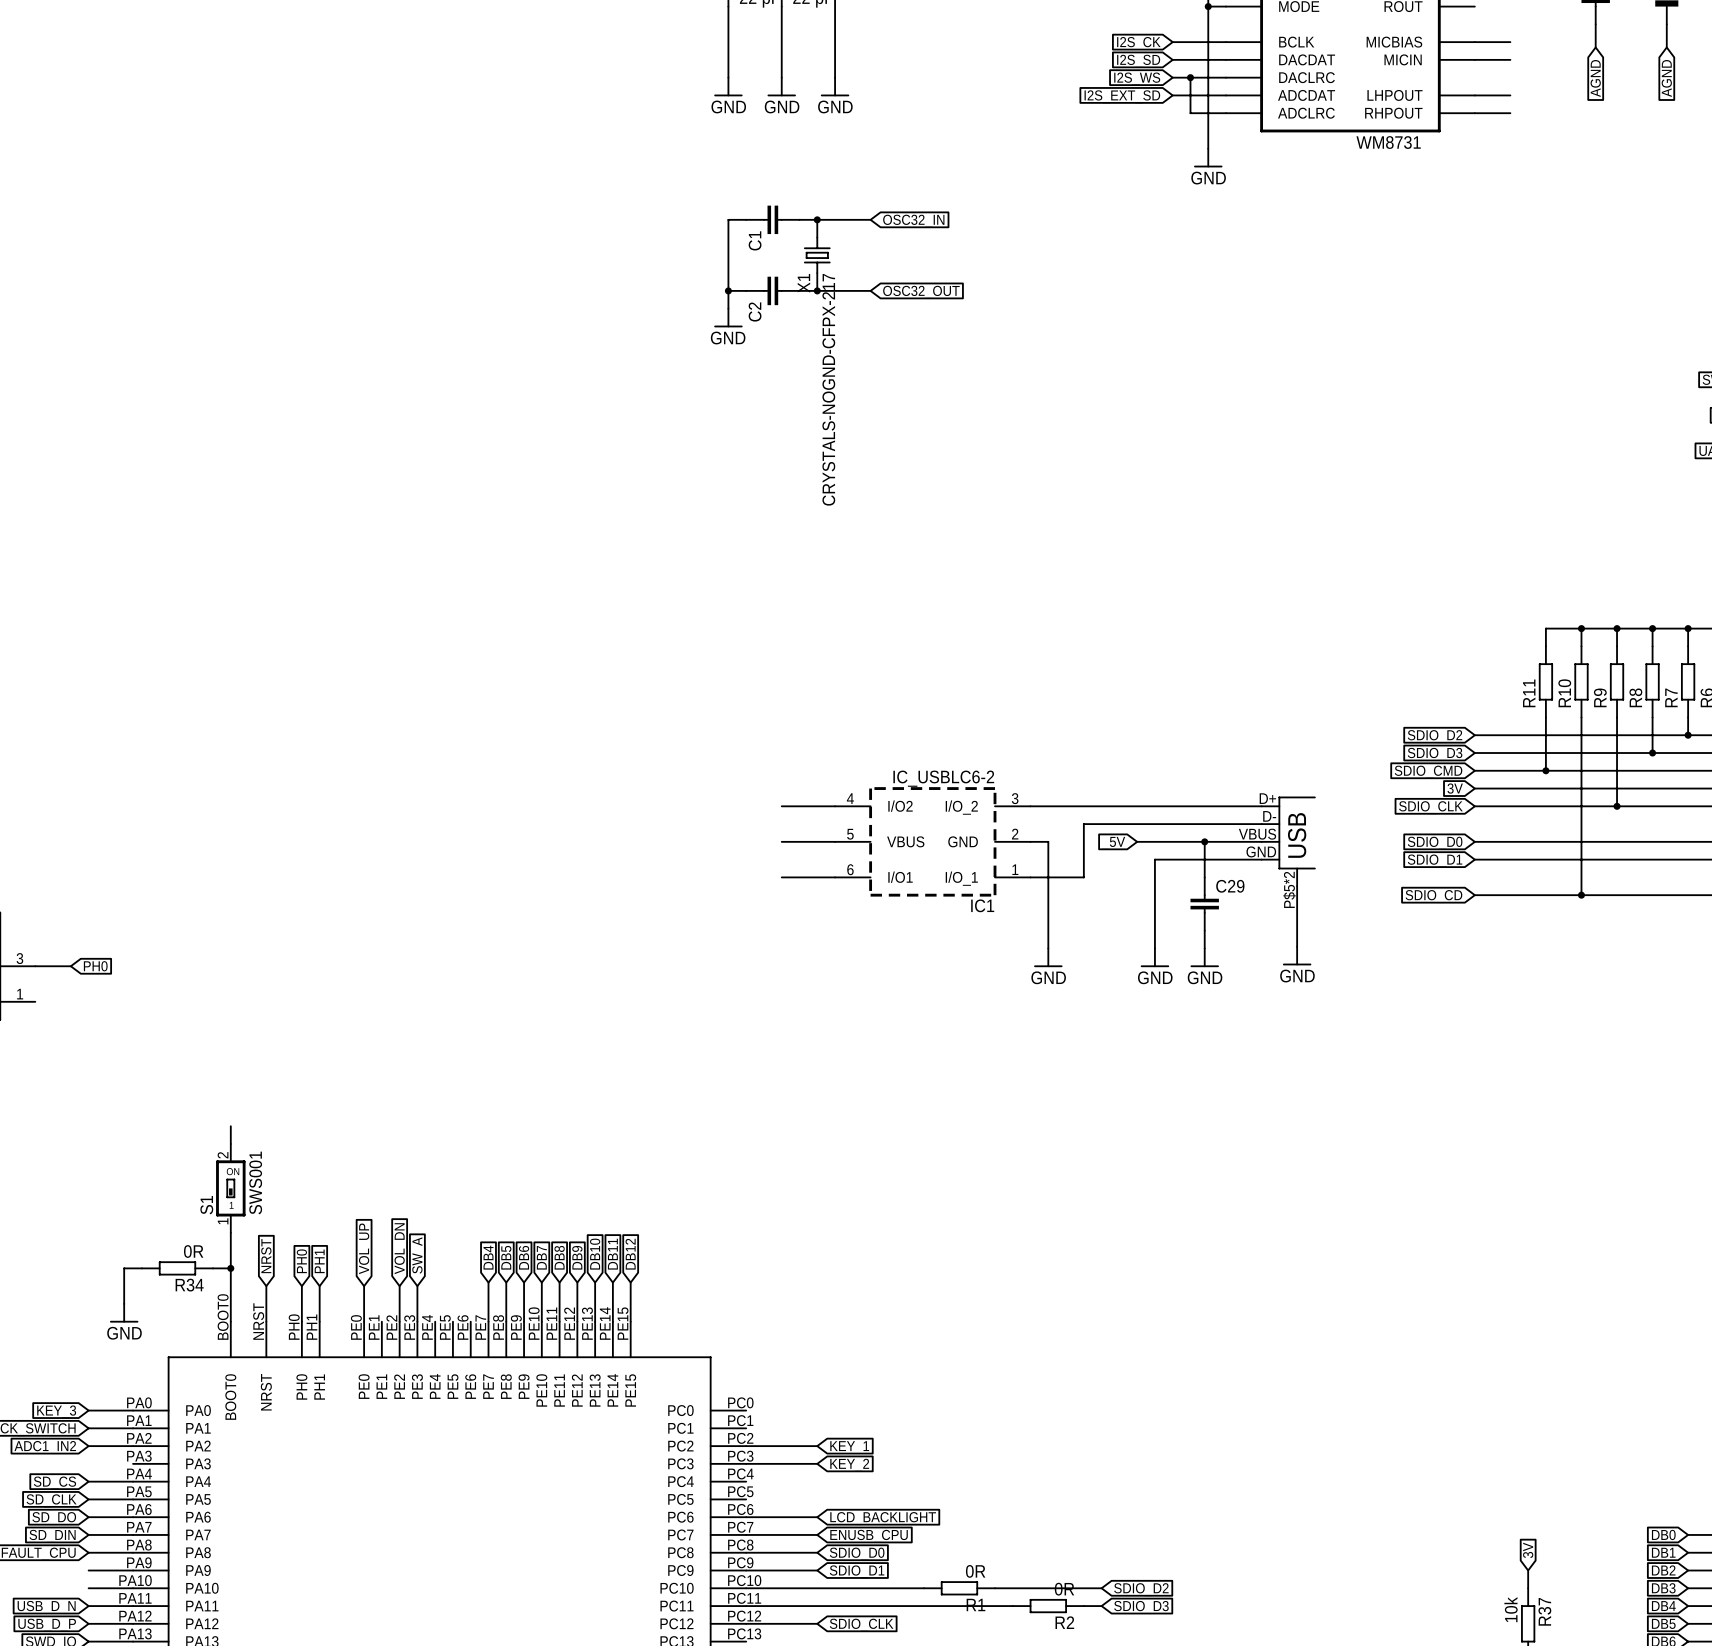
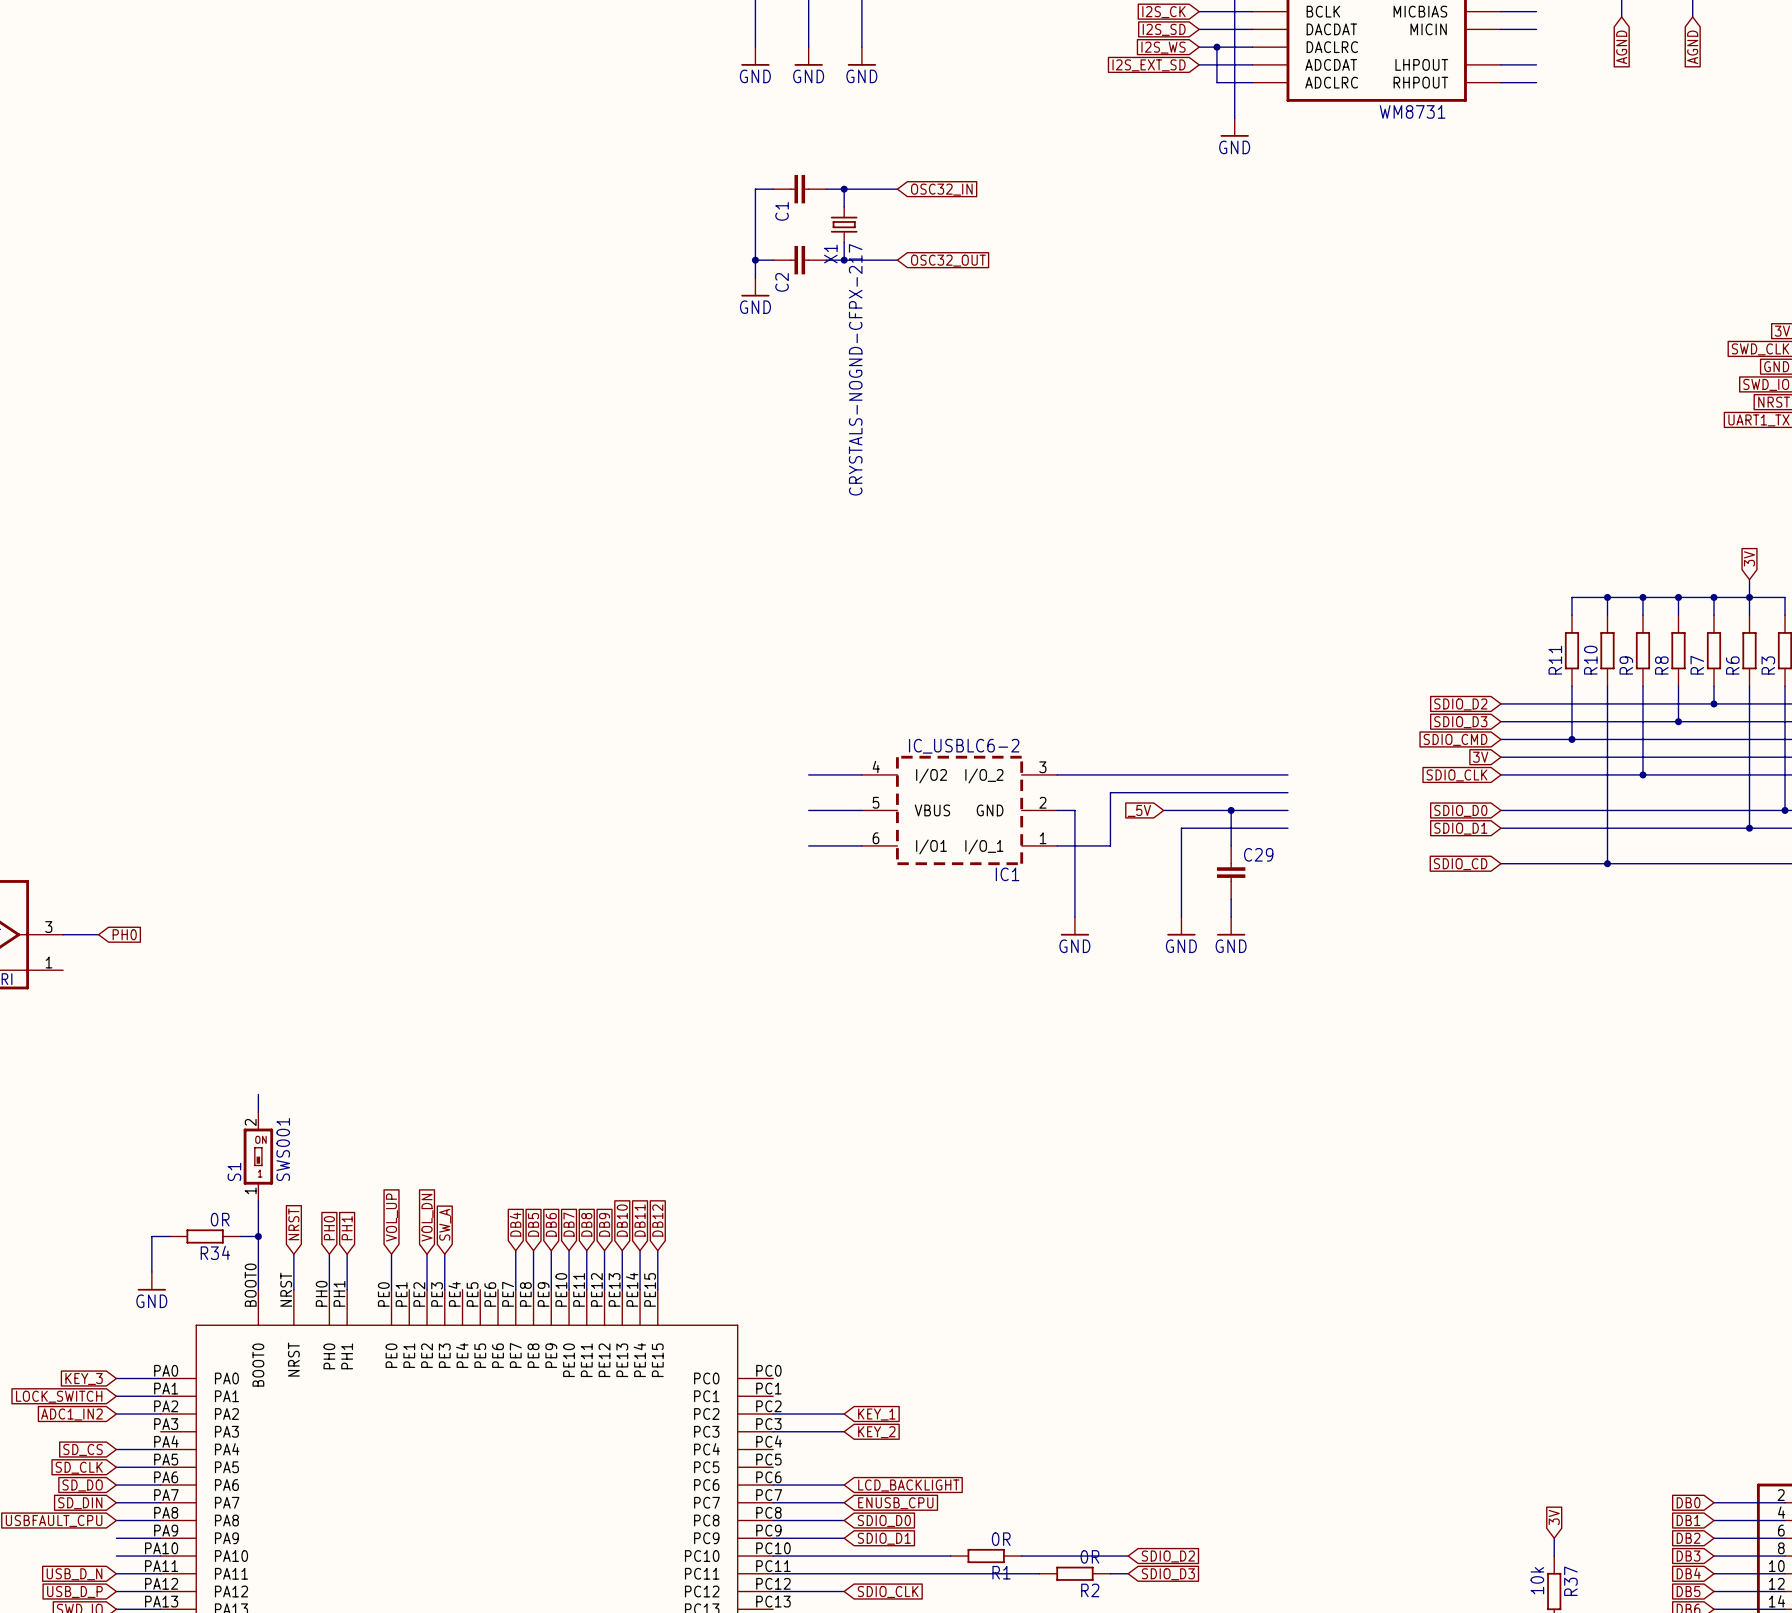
part: (1288, 841) -> none
wire: (1297, 886) (1297, 946) -> none
power symbol: GND (1297, 956) -> none

